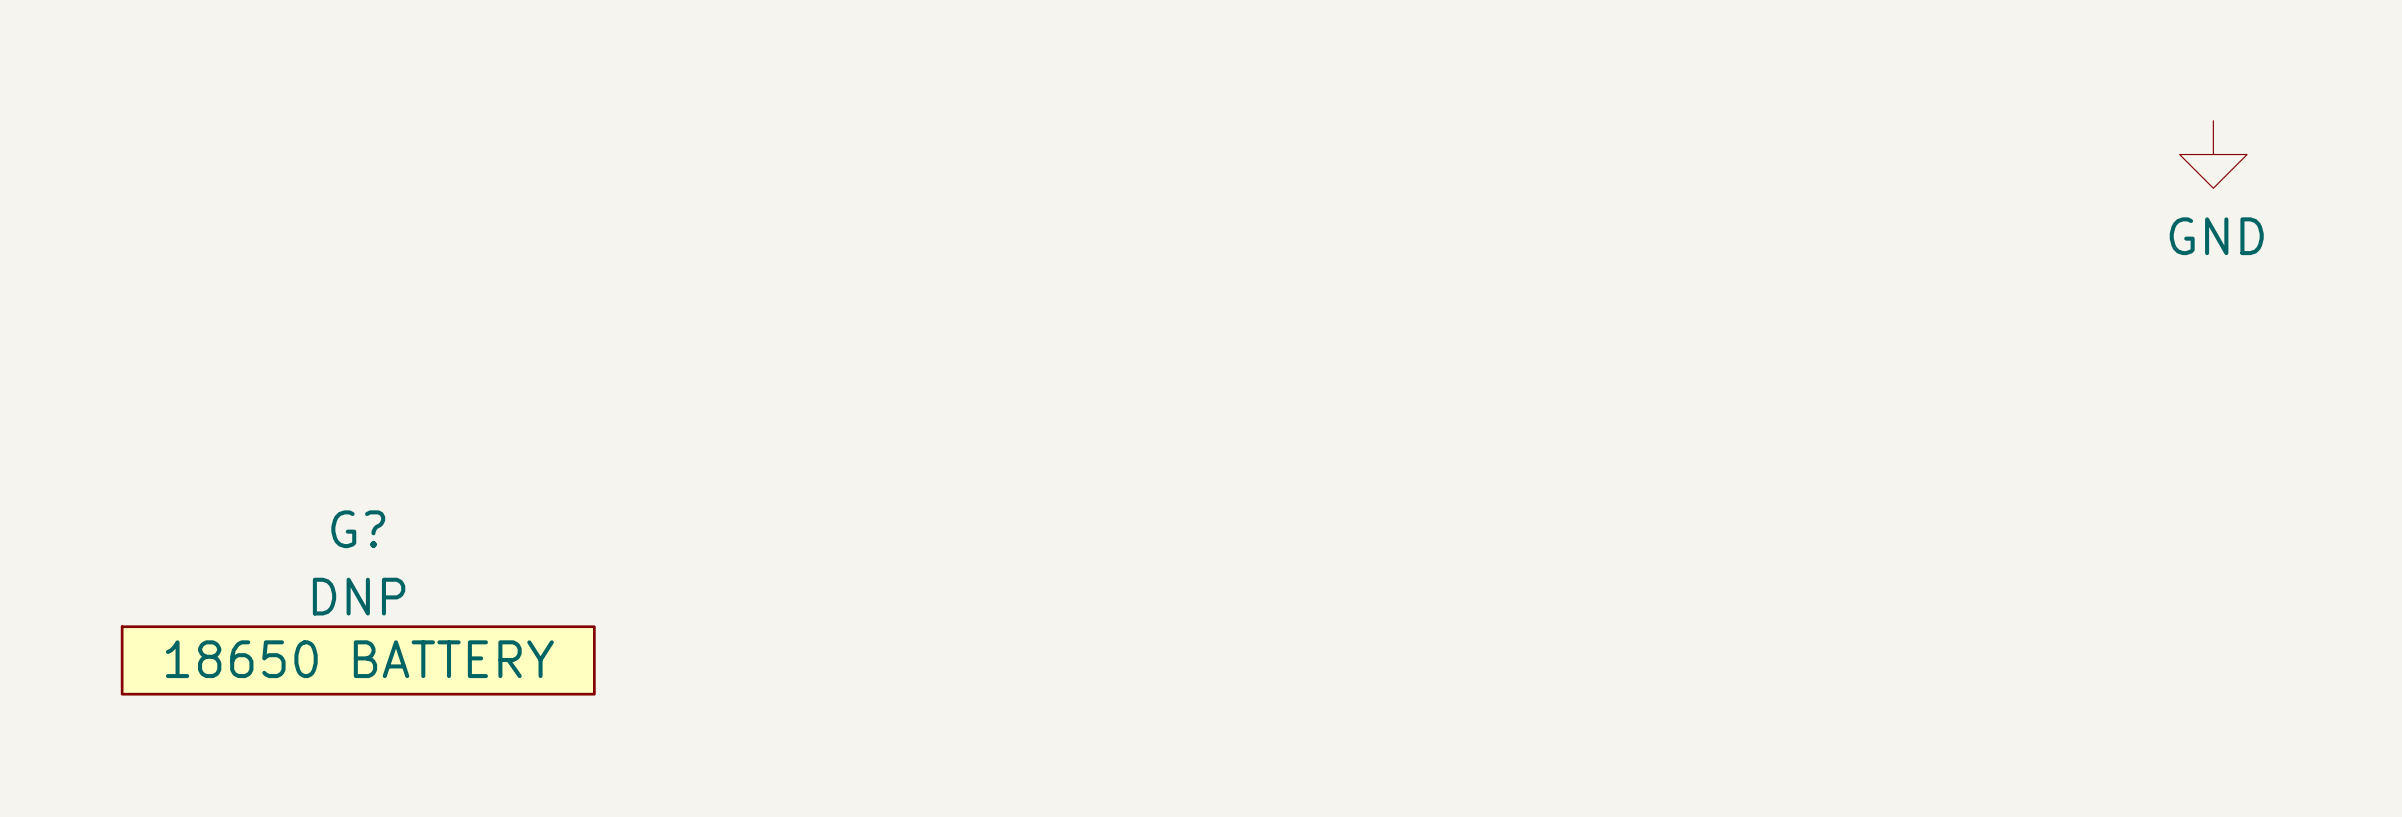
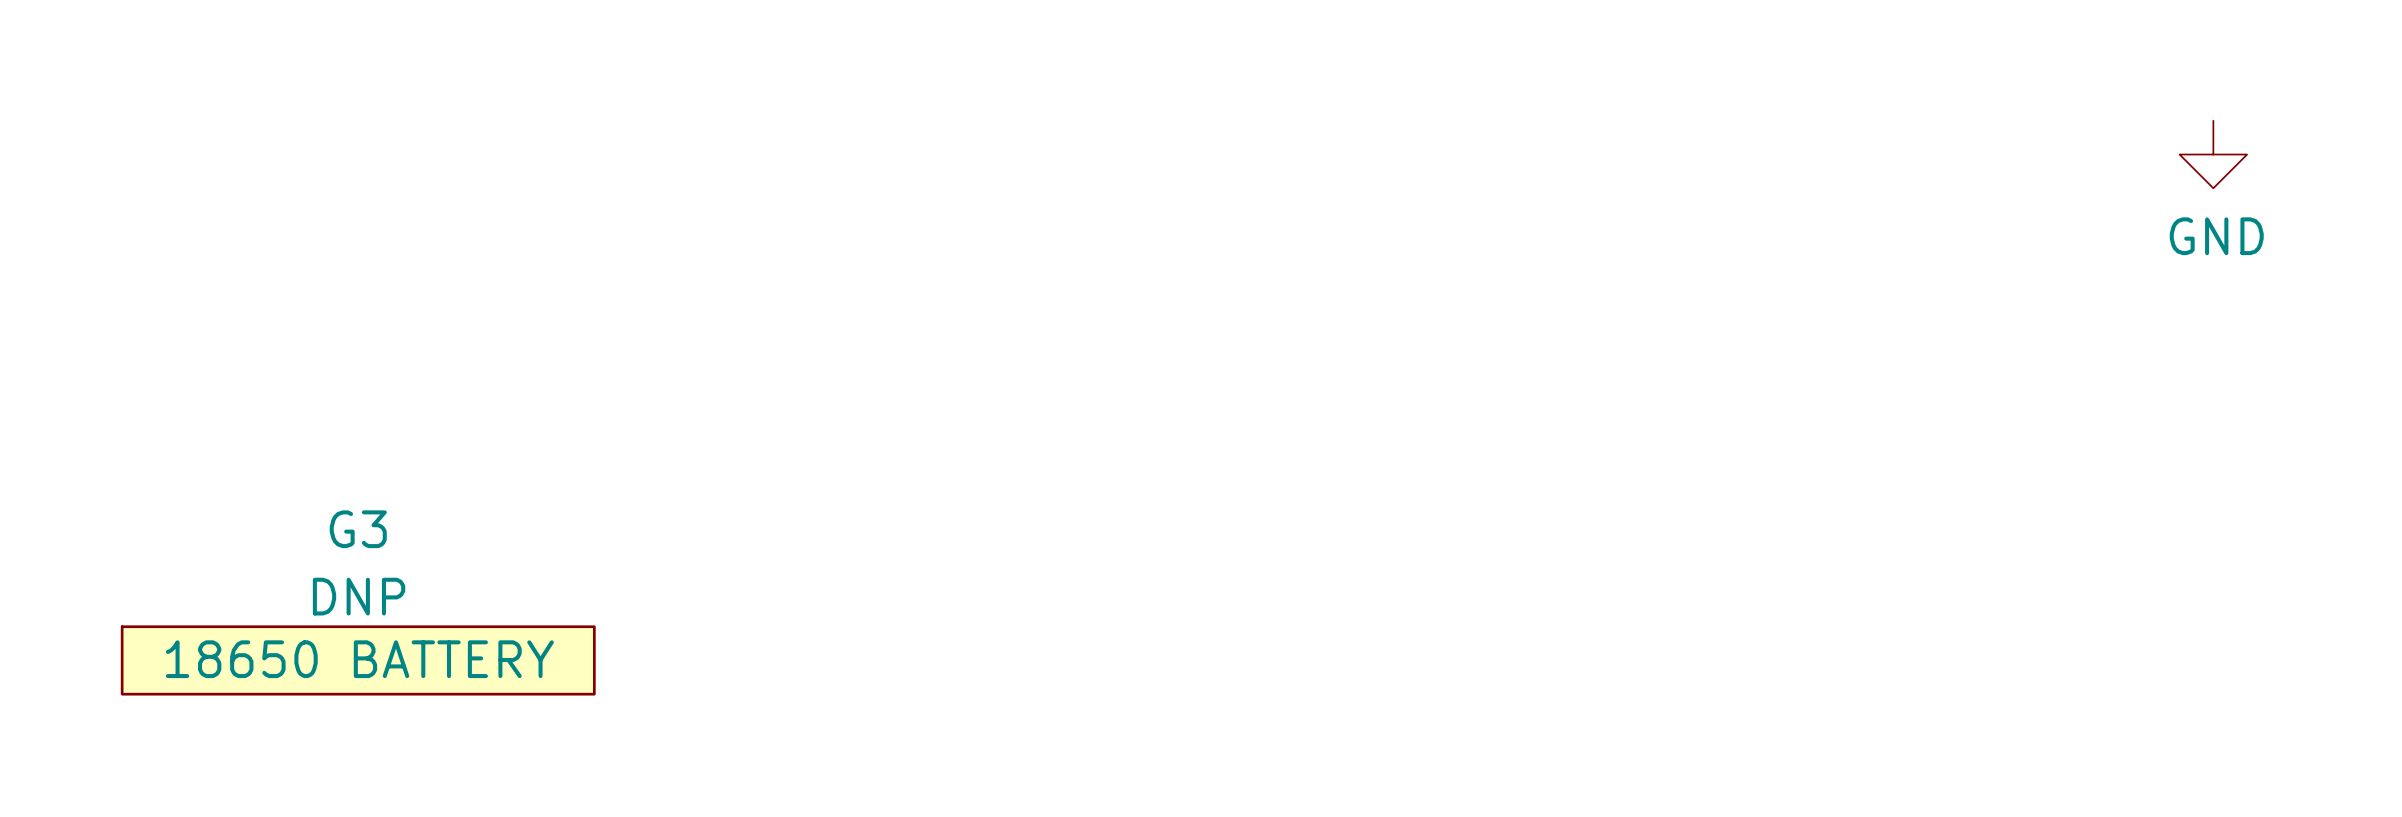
G? name: G? (358, 529) -> G3 (358, 529)

